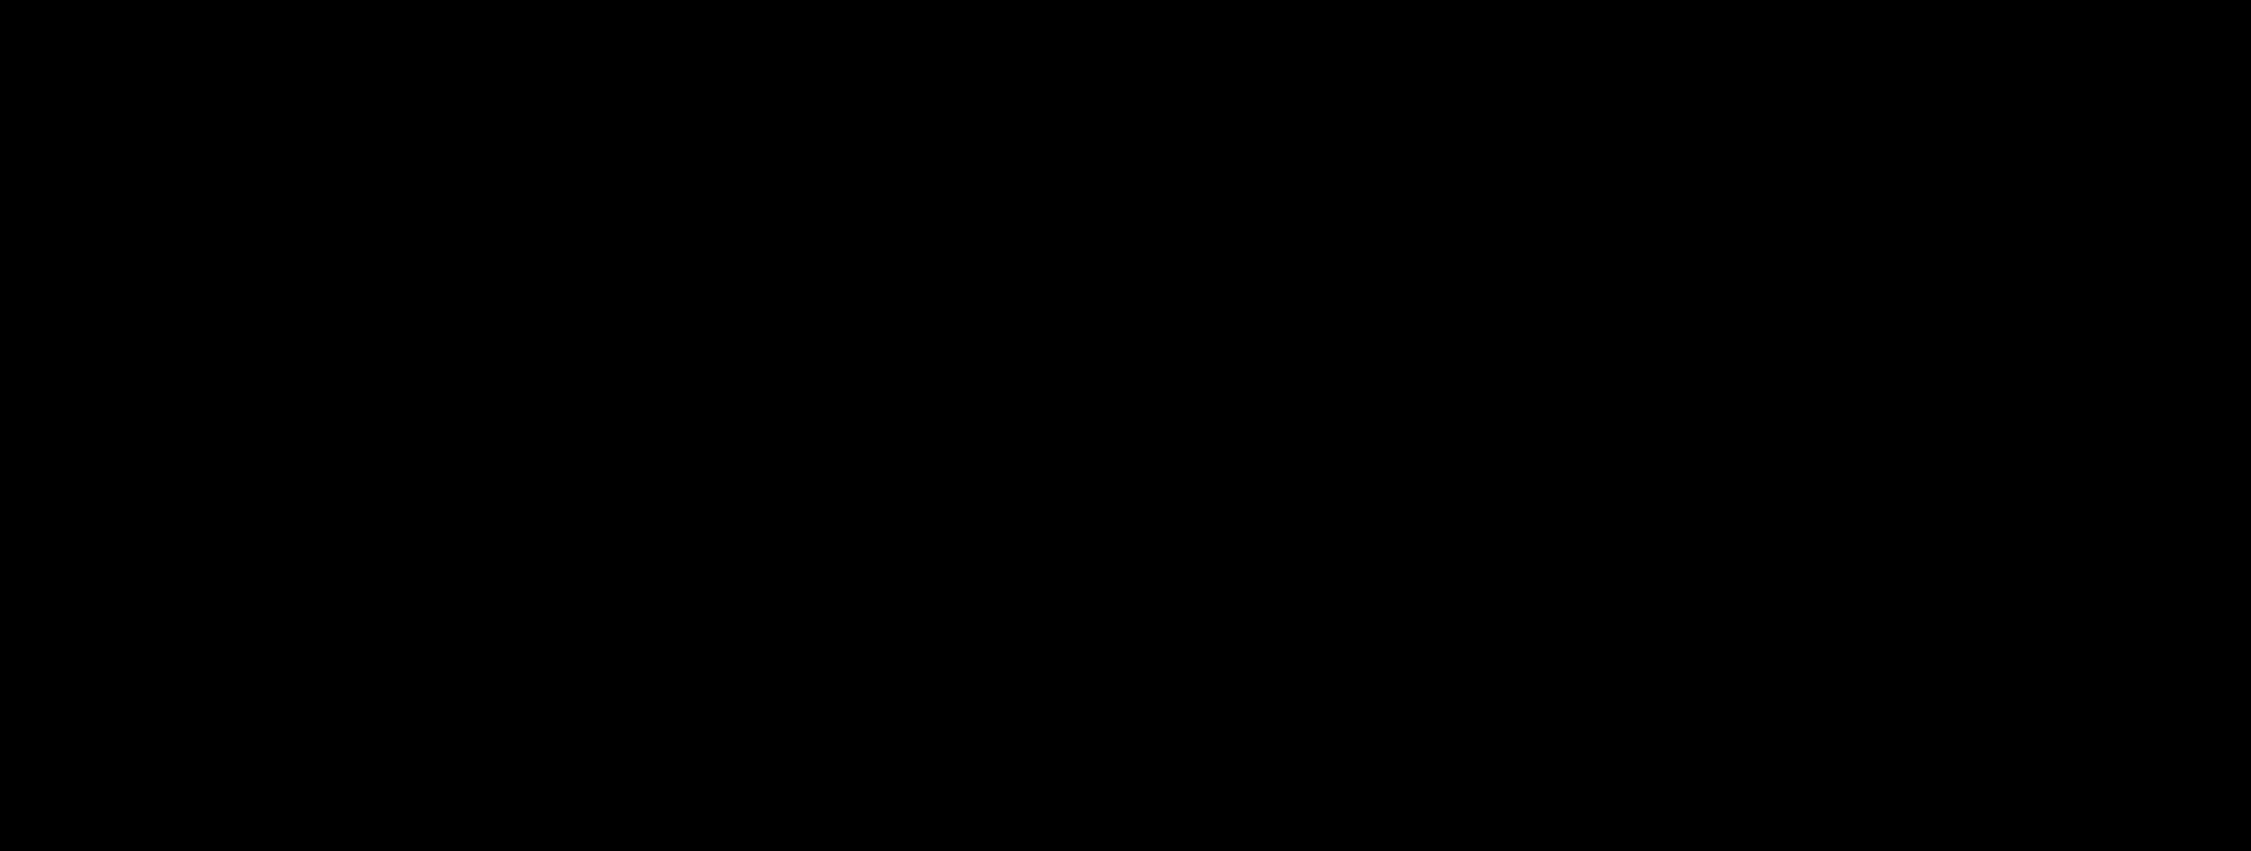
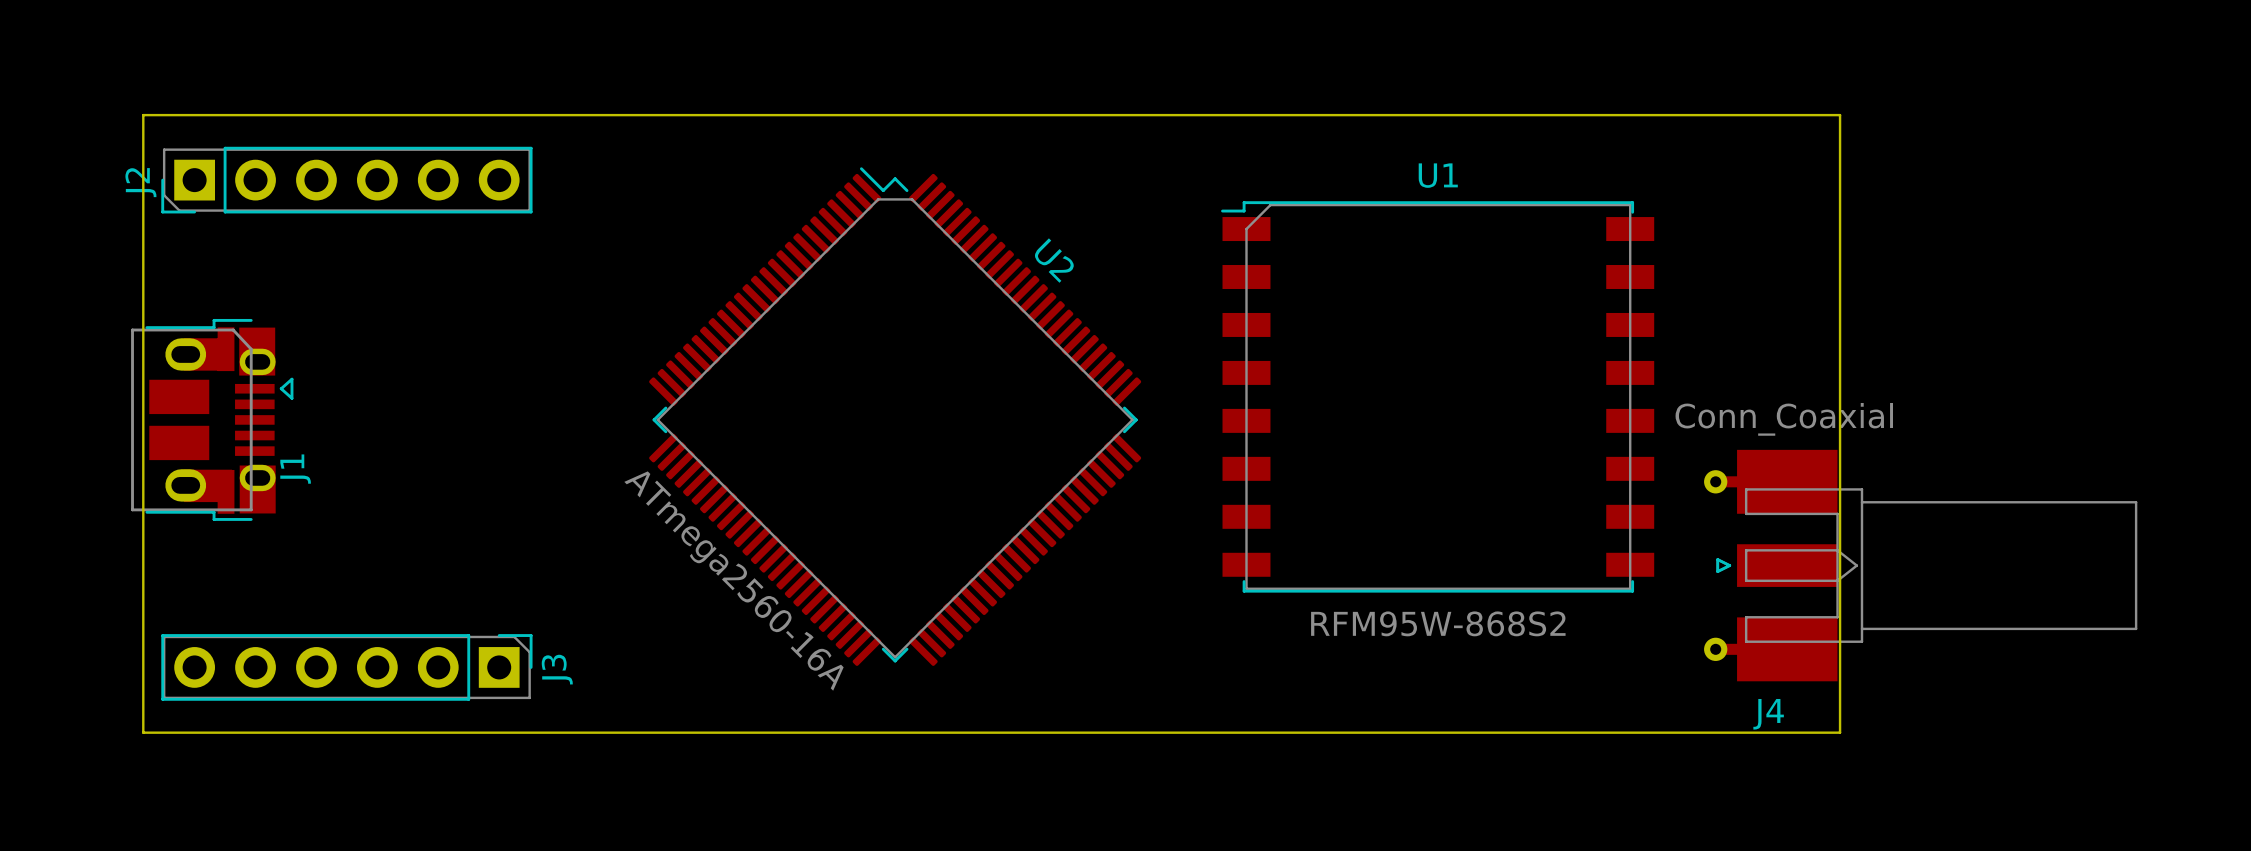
board edge: none -> (143, 115) (143, 732) (1840, 732) (1840, 115) (143, 115)
J2: none -> (346, 180)
U1: none -> RFM95W-868S2 (1437, 396)
U2: none -> ATmega2560-16A (895, 416)
J1: none -> (212, 419)
J4: none -> Conn_Coaxial (1920, 565)
J3: none -> (346, 667)

